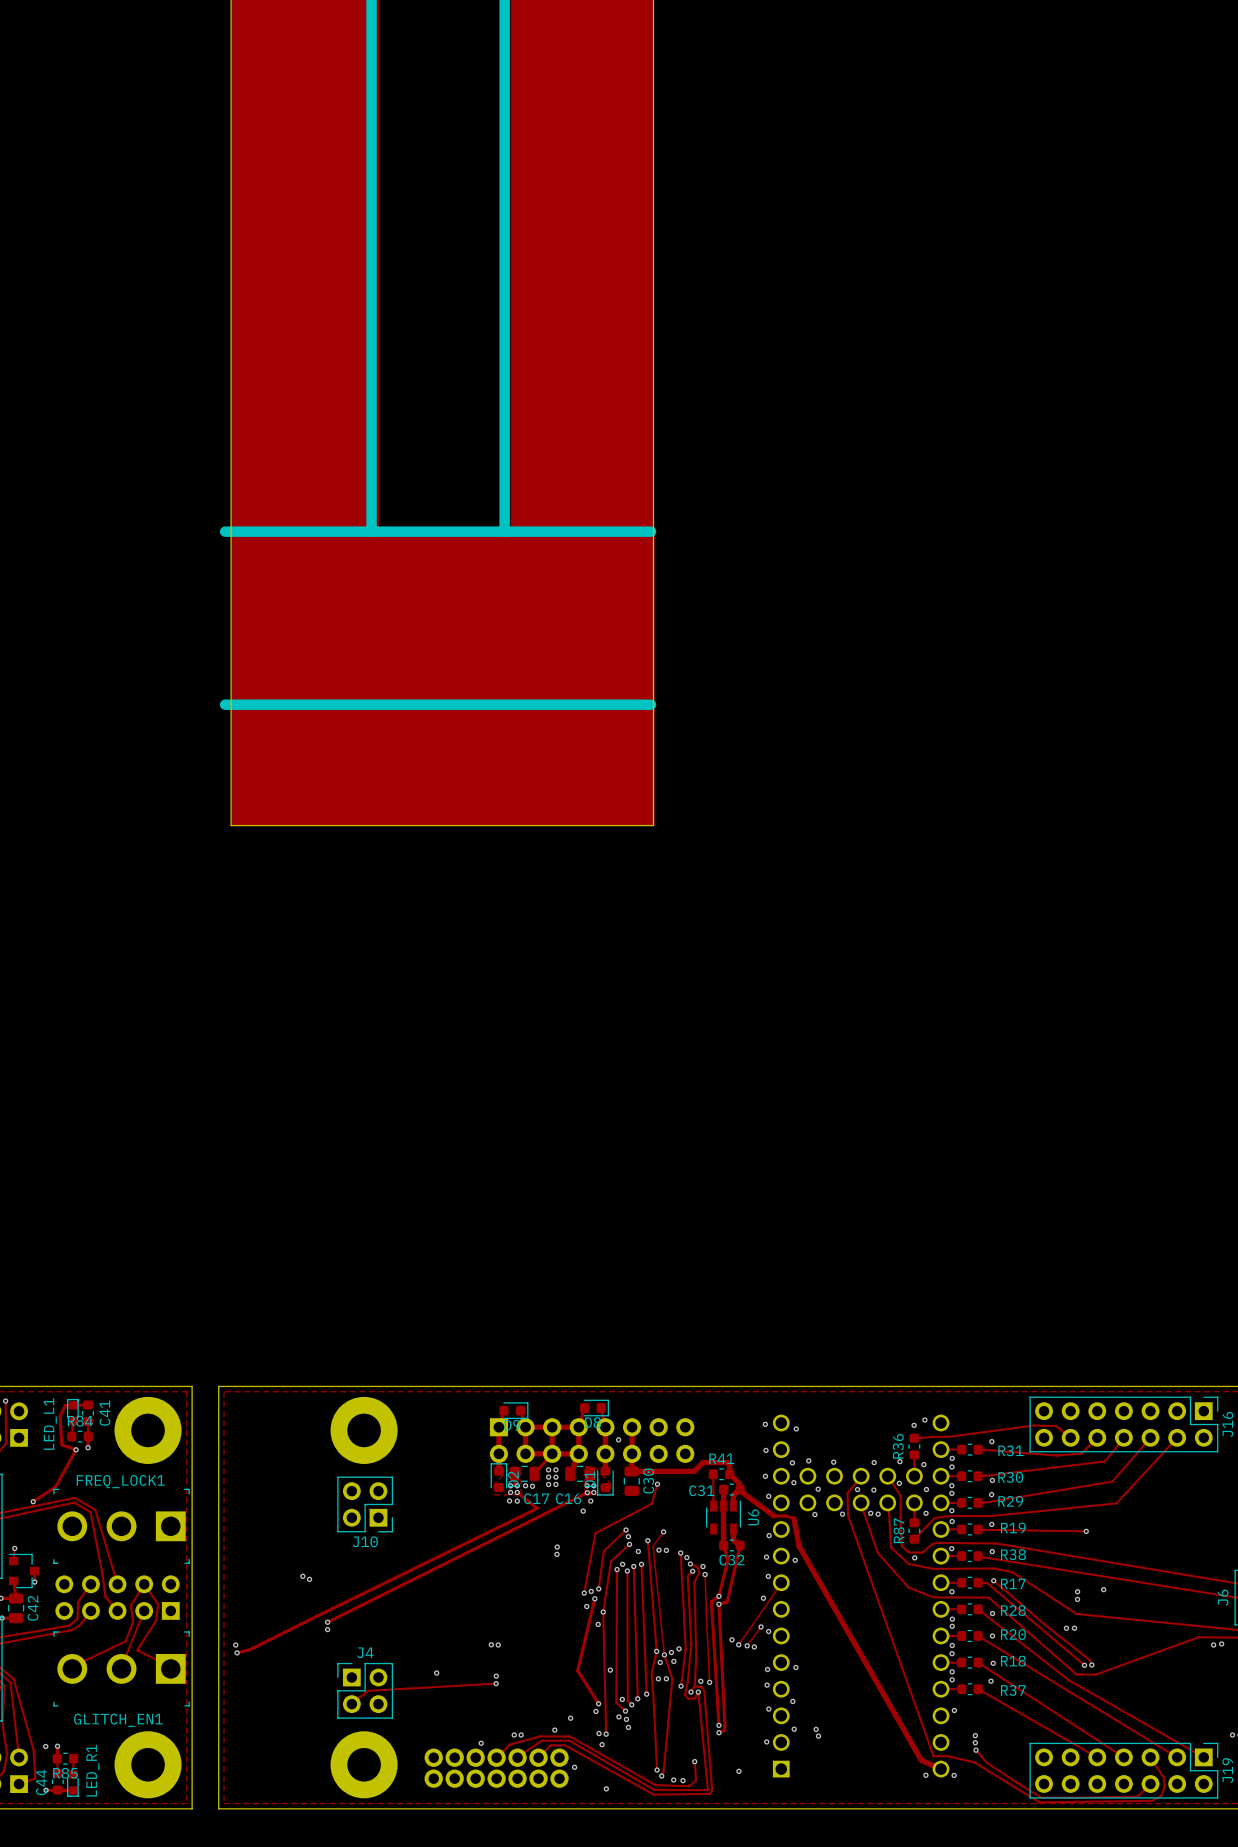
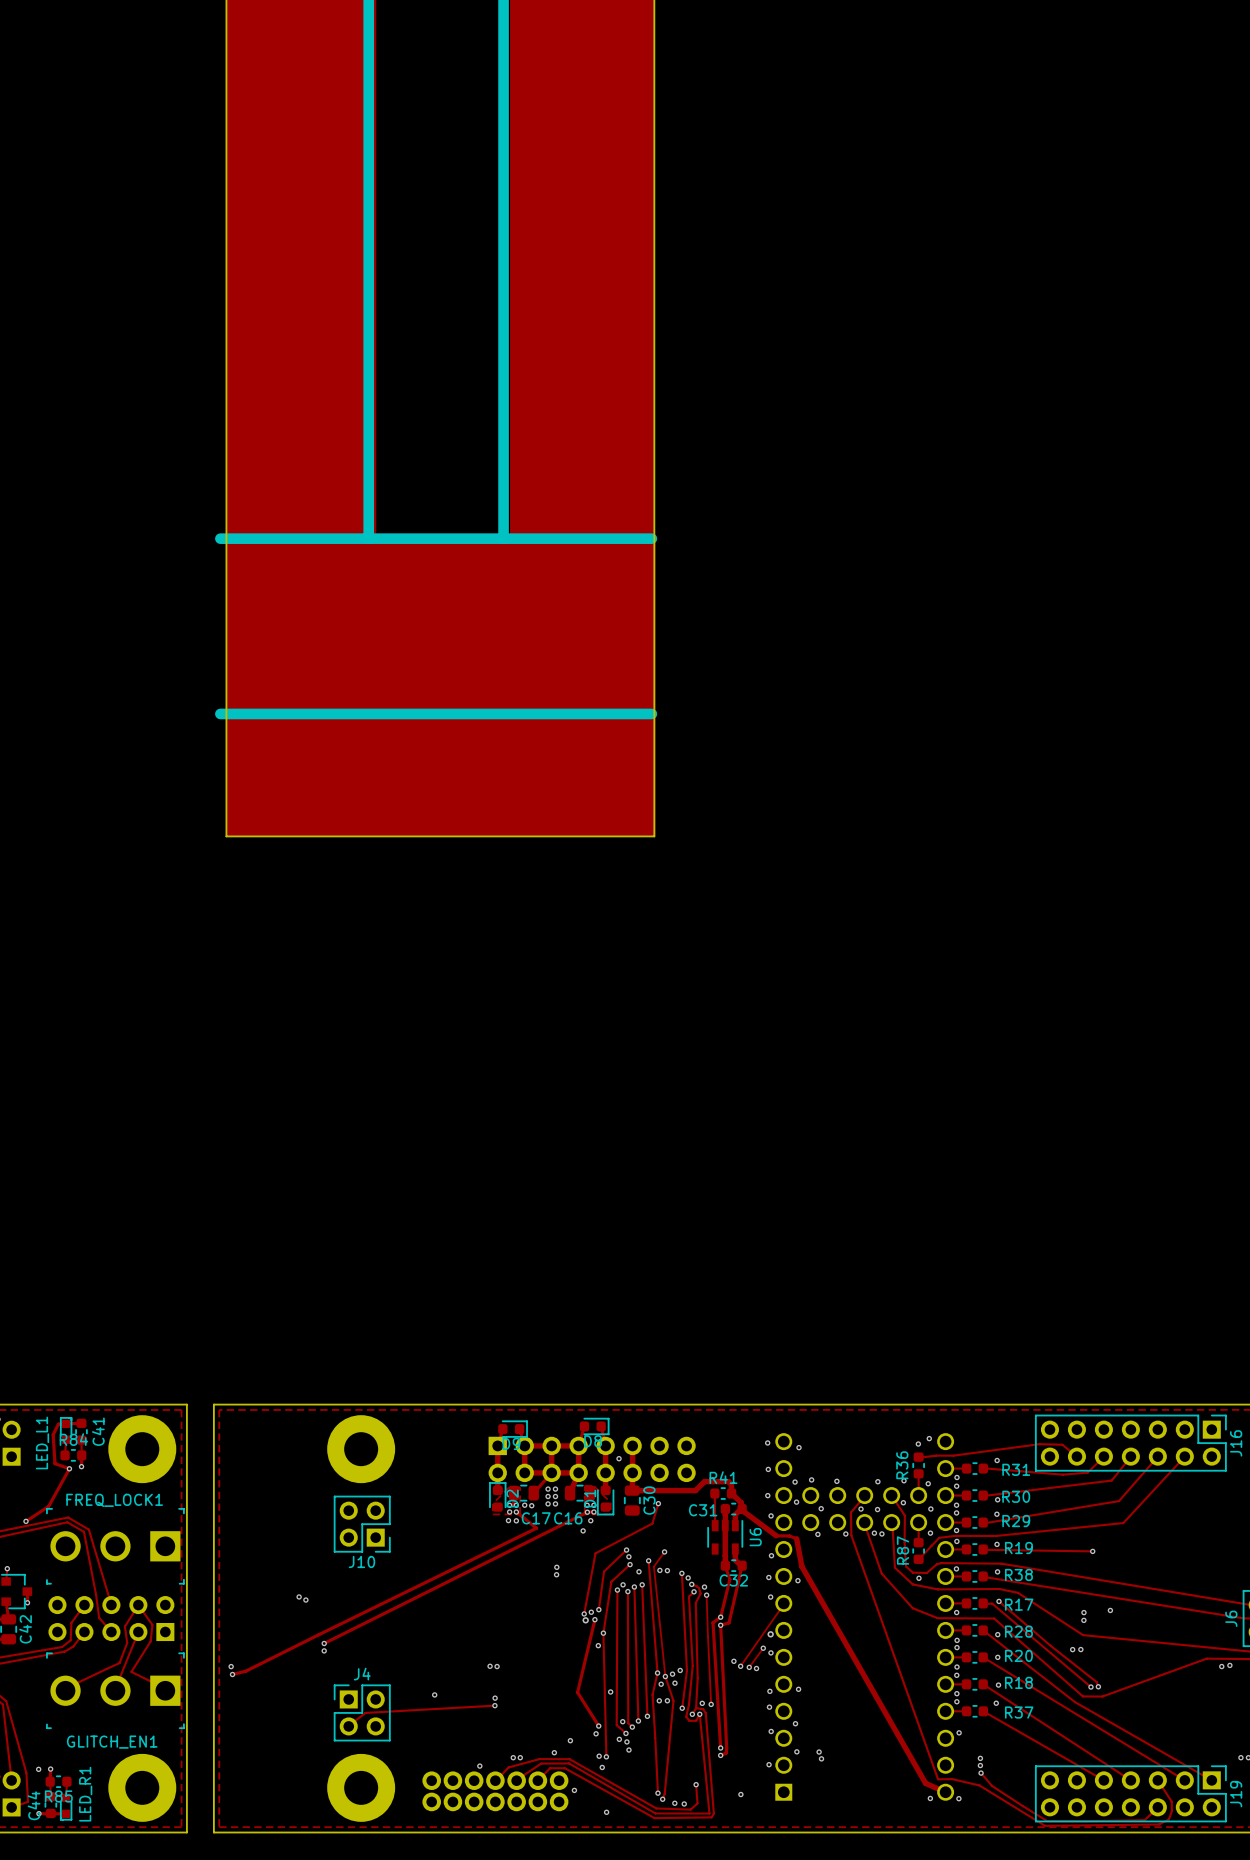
via: (763, 1598) -> none
via: none -> (585, 1620)
via: (586, 1606) -> none
via: none -> (770, 1634)

